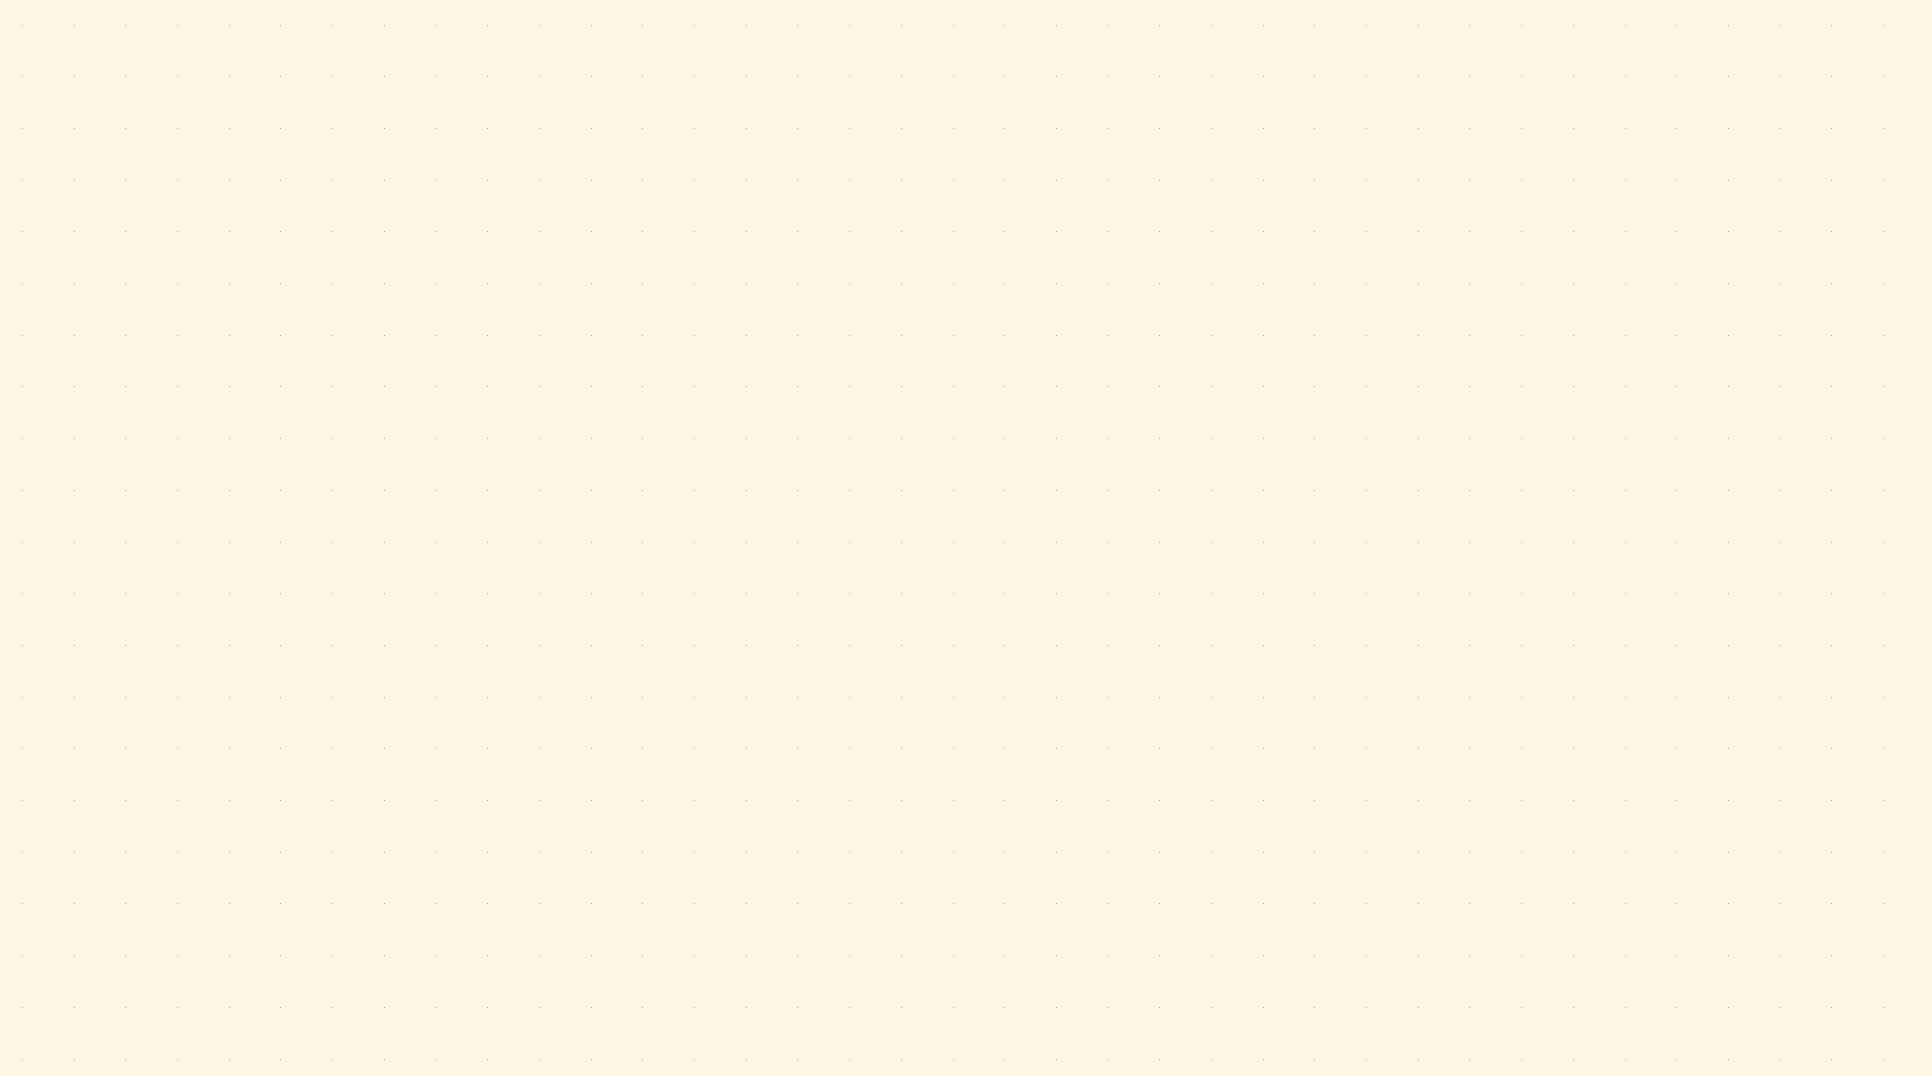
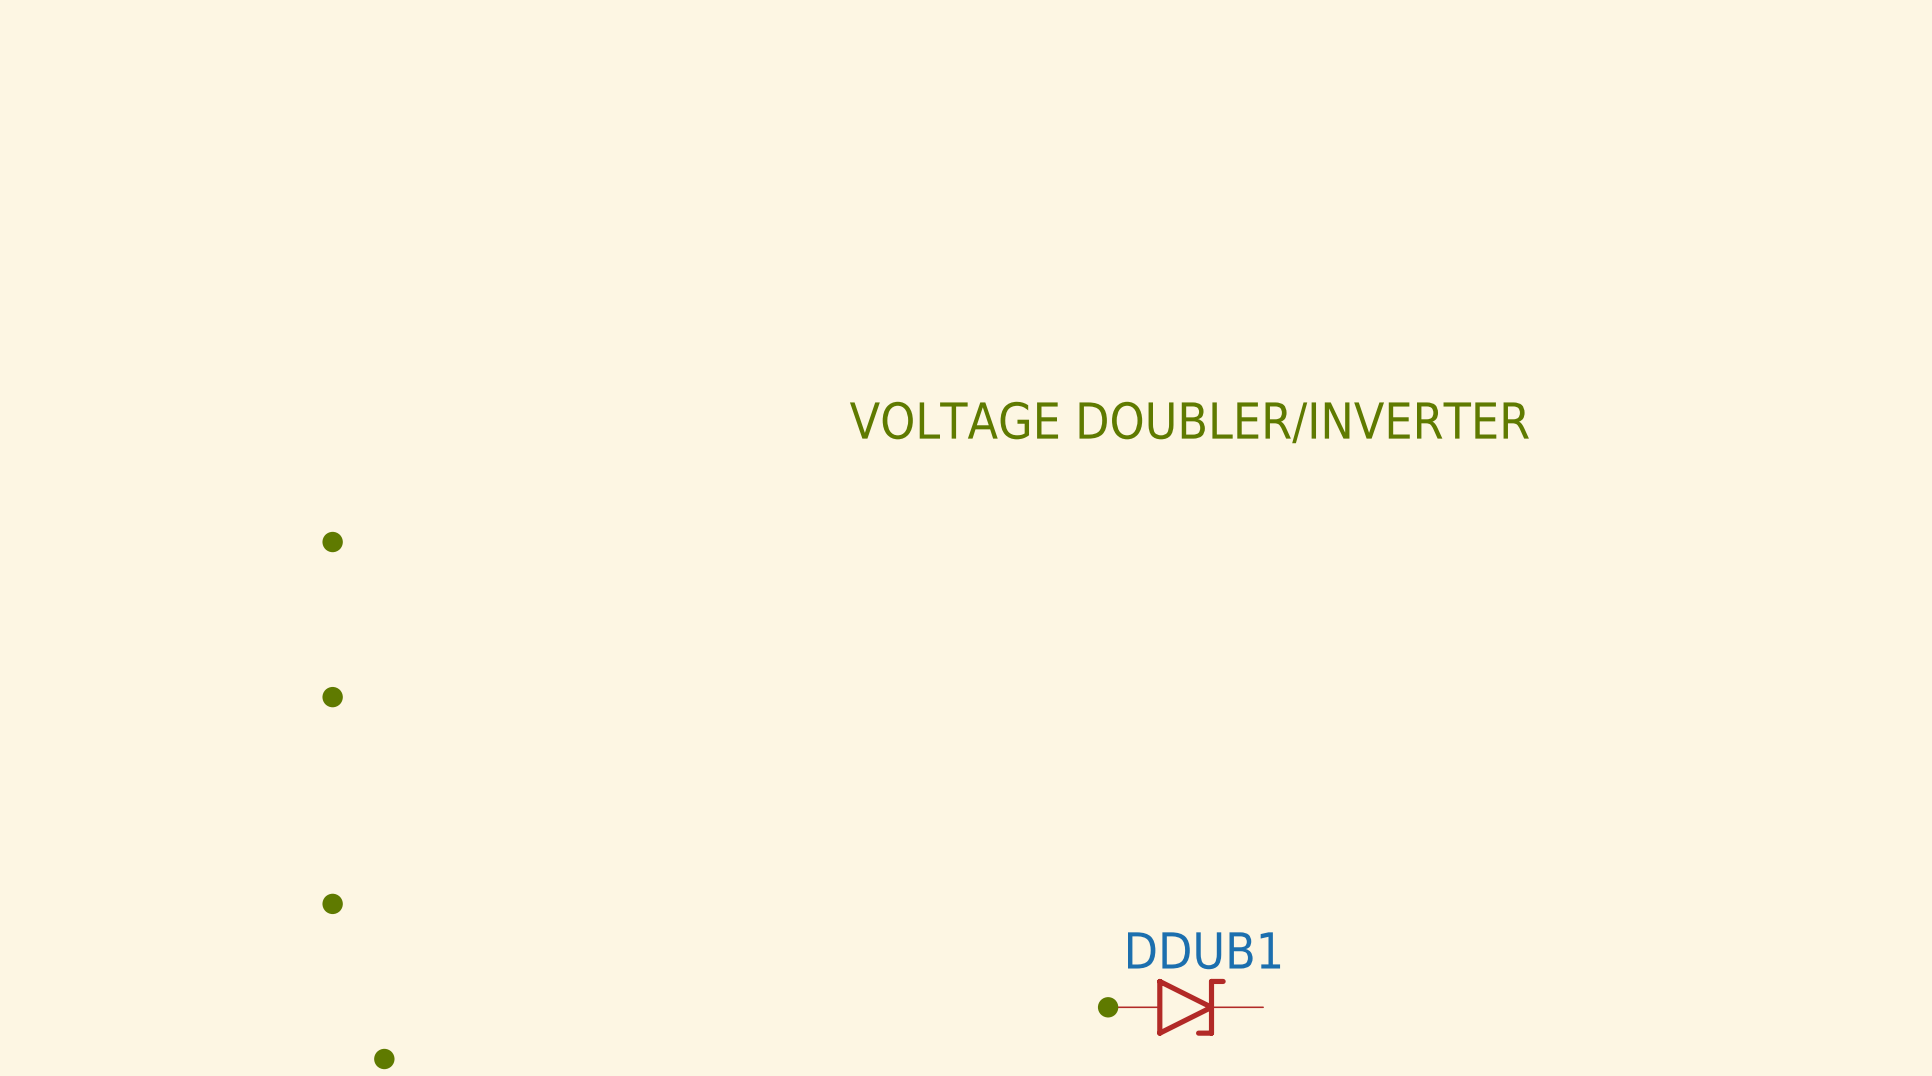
text: none -> VOLTAGE DOUBLER/INVERTER (1189, 422)
junction: none -> (332, 542)
junction: none -> (332, 697)
junction: none -> (332, 903)
junction: none -> (1108, 1007)
DDUB1: none -> (1185, 1007)
junction: none -> (384, 1059)

